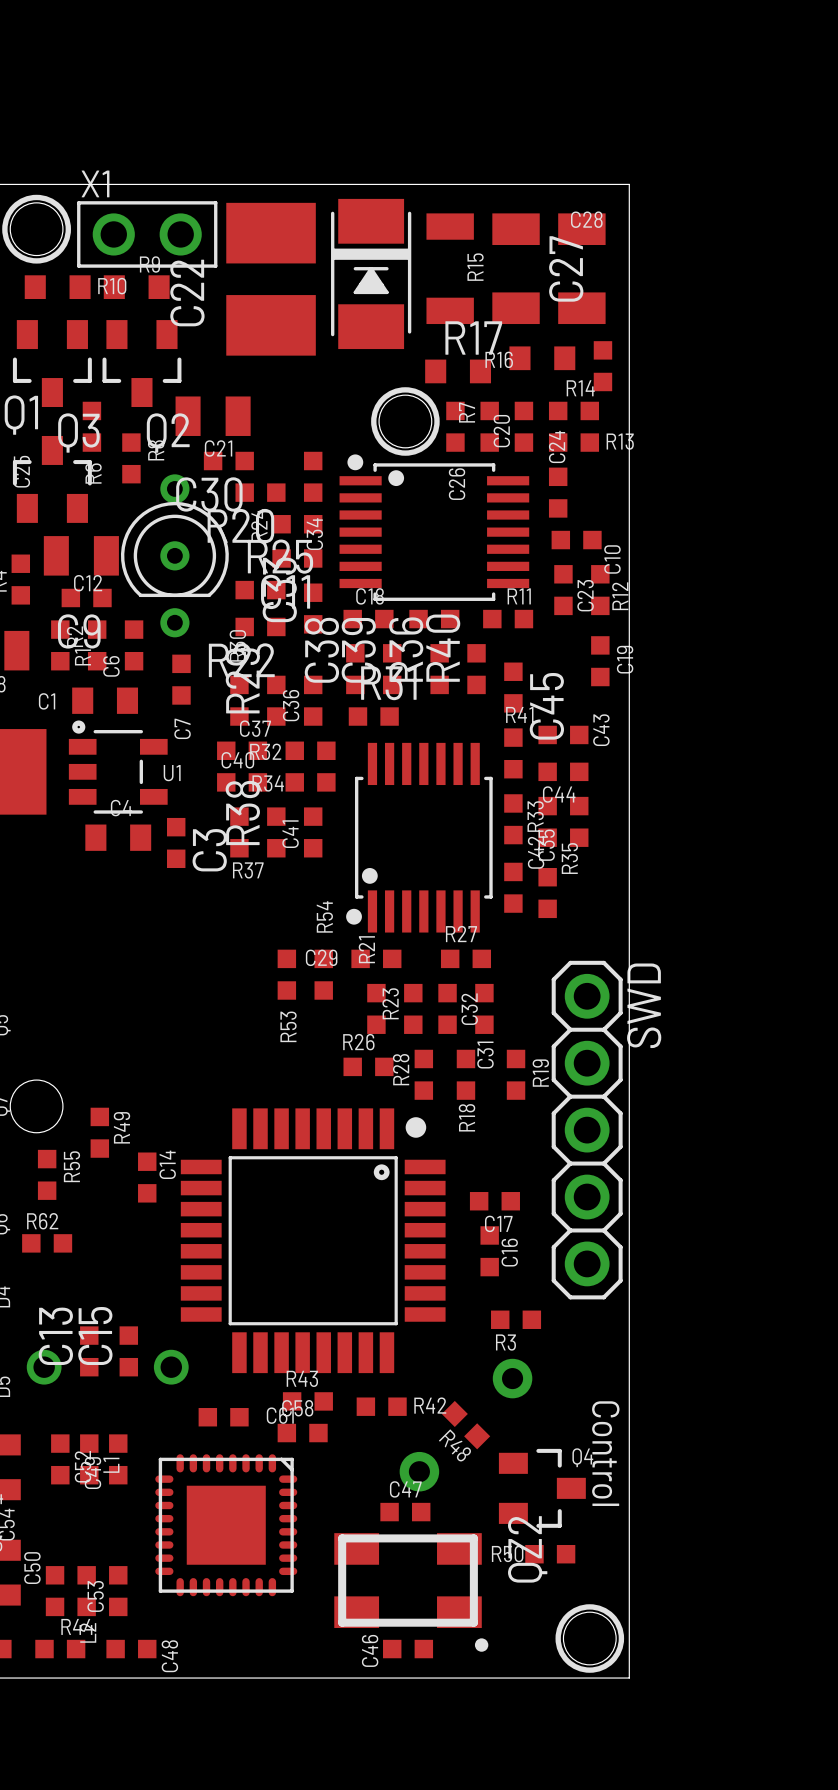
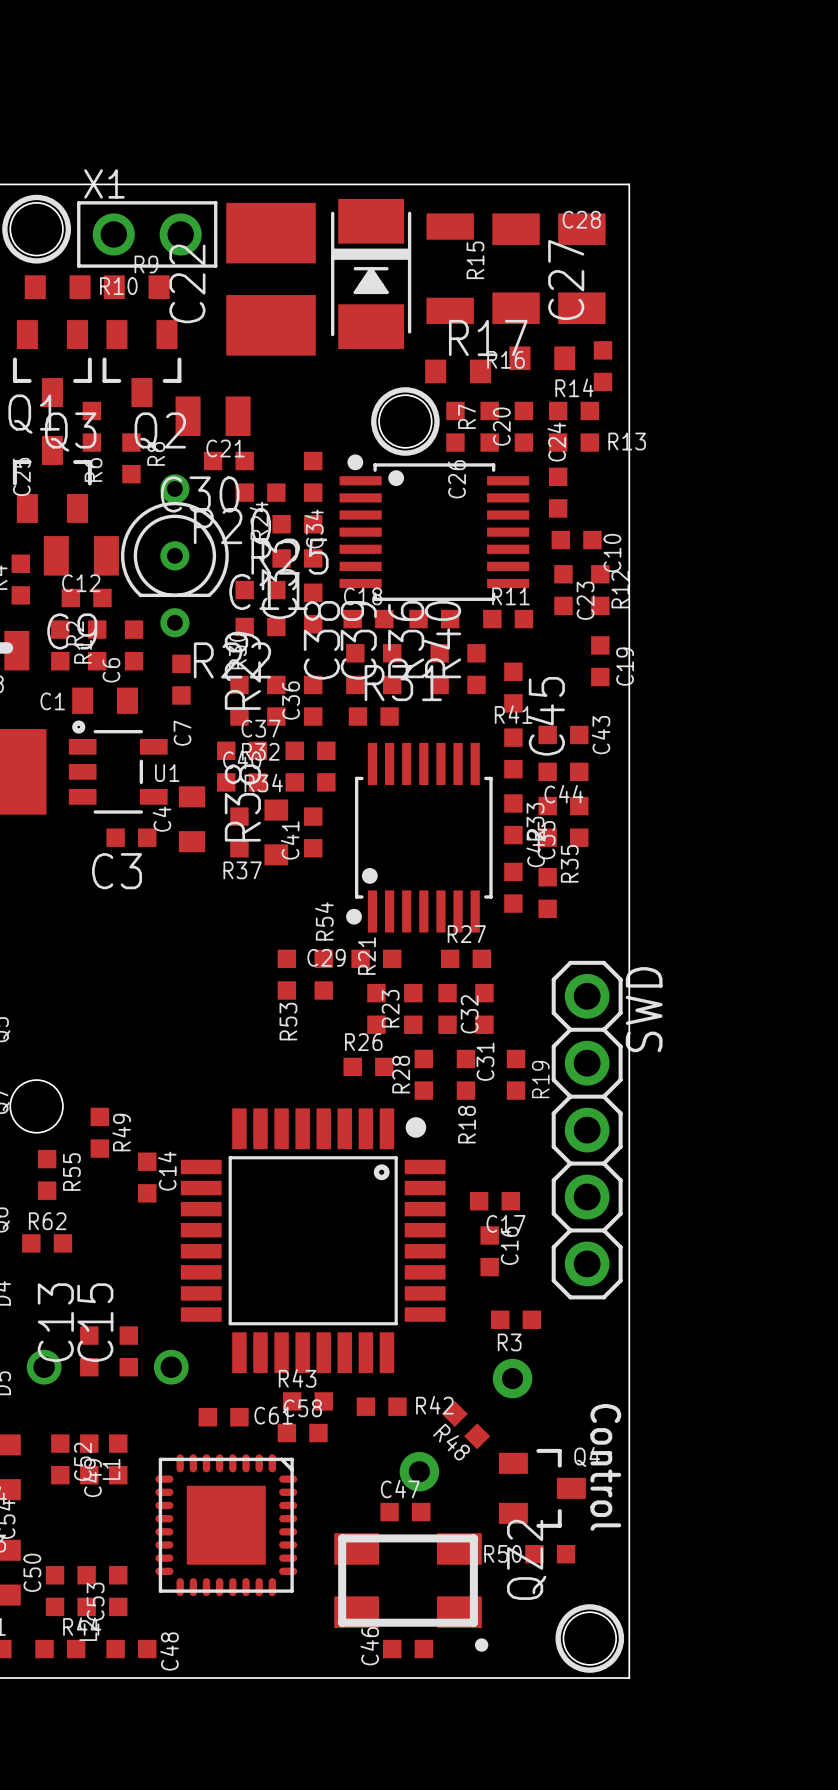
R38 footprint: [267, 807, 286, 858] -> [264, 799, 289, 866]
C4 rotation: 0° (118, 837) -> 90° clockwise (192, 819)
C4 position: (118, 837) -> (192, 819)
C3 rotation: 0° (176, 842) -> 90° clockwise (131, 837)
C3 position: (176, 842) -> (131, 837)

